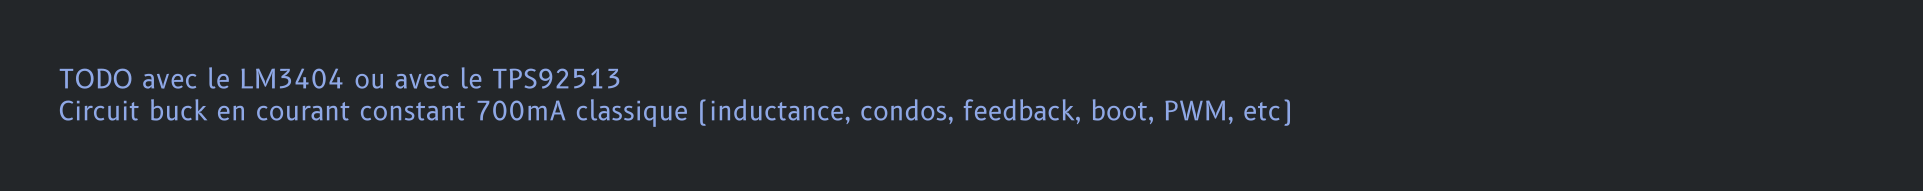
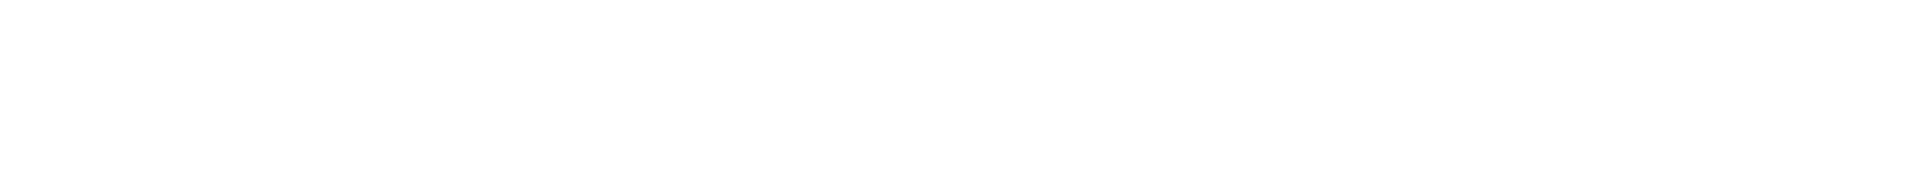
text: TODO avec le LM3404 ou avec le TPS92513 (339, 77) -> none
text: Circuit buck en courant constant 700mA classique (inductance, condos, feedback, boot, PWM, etc) (674, 113) -> none

